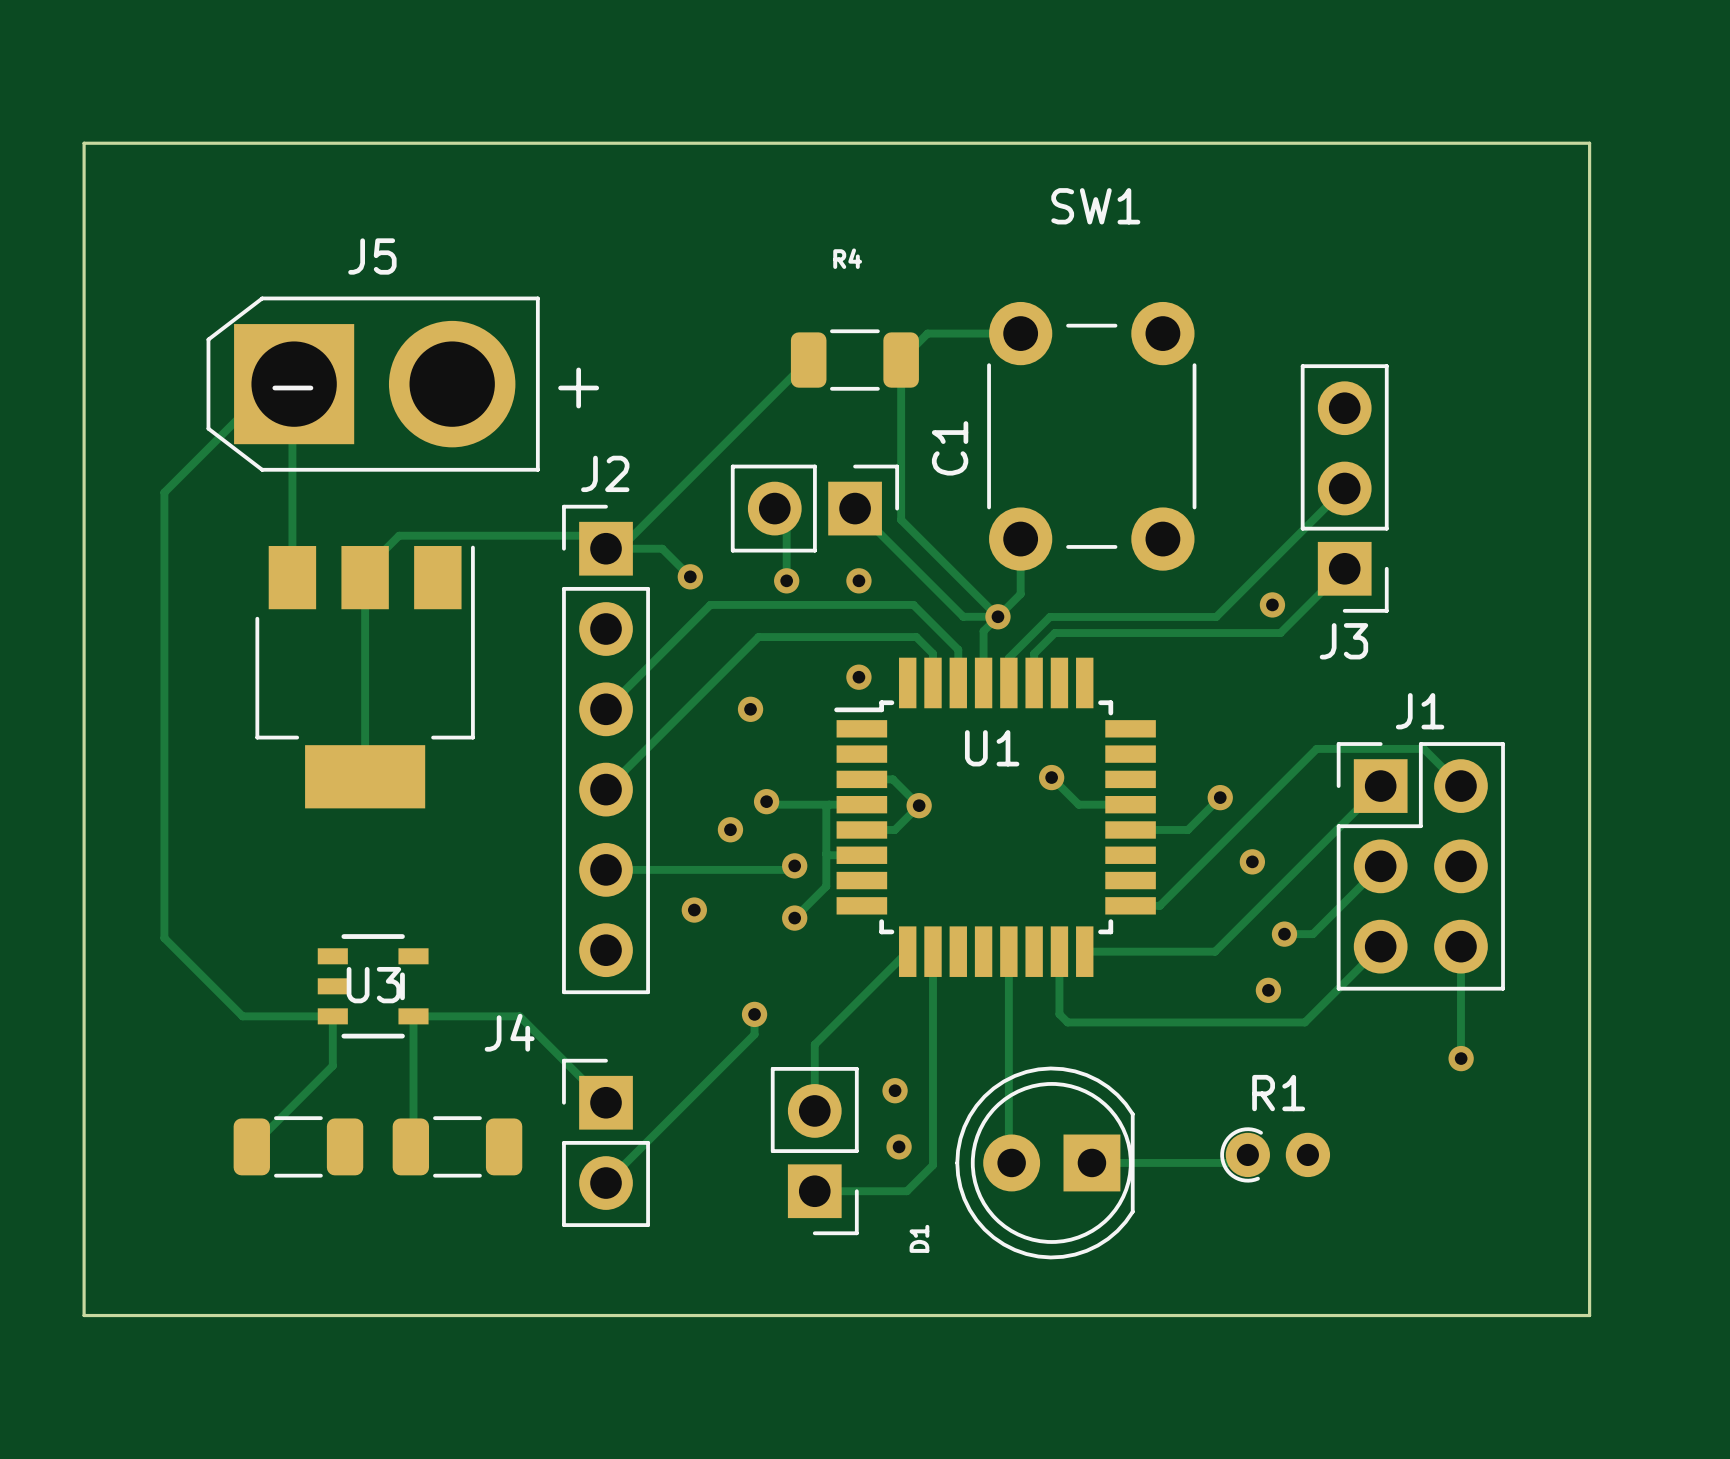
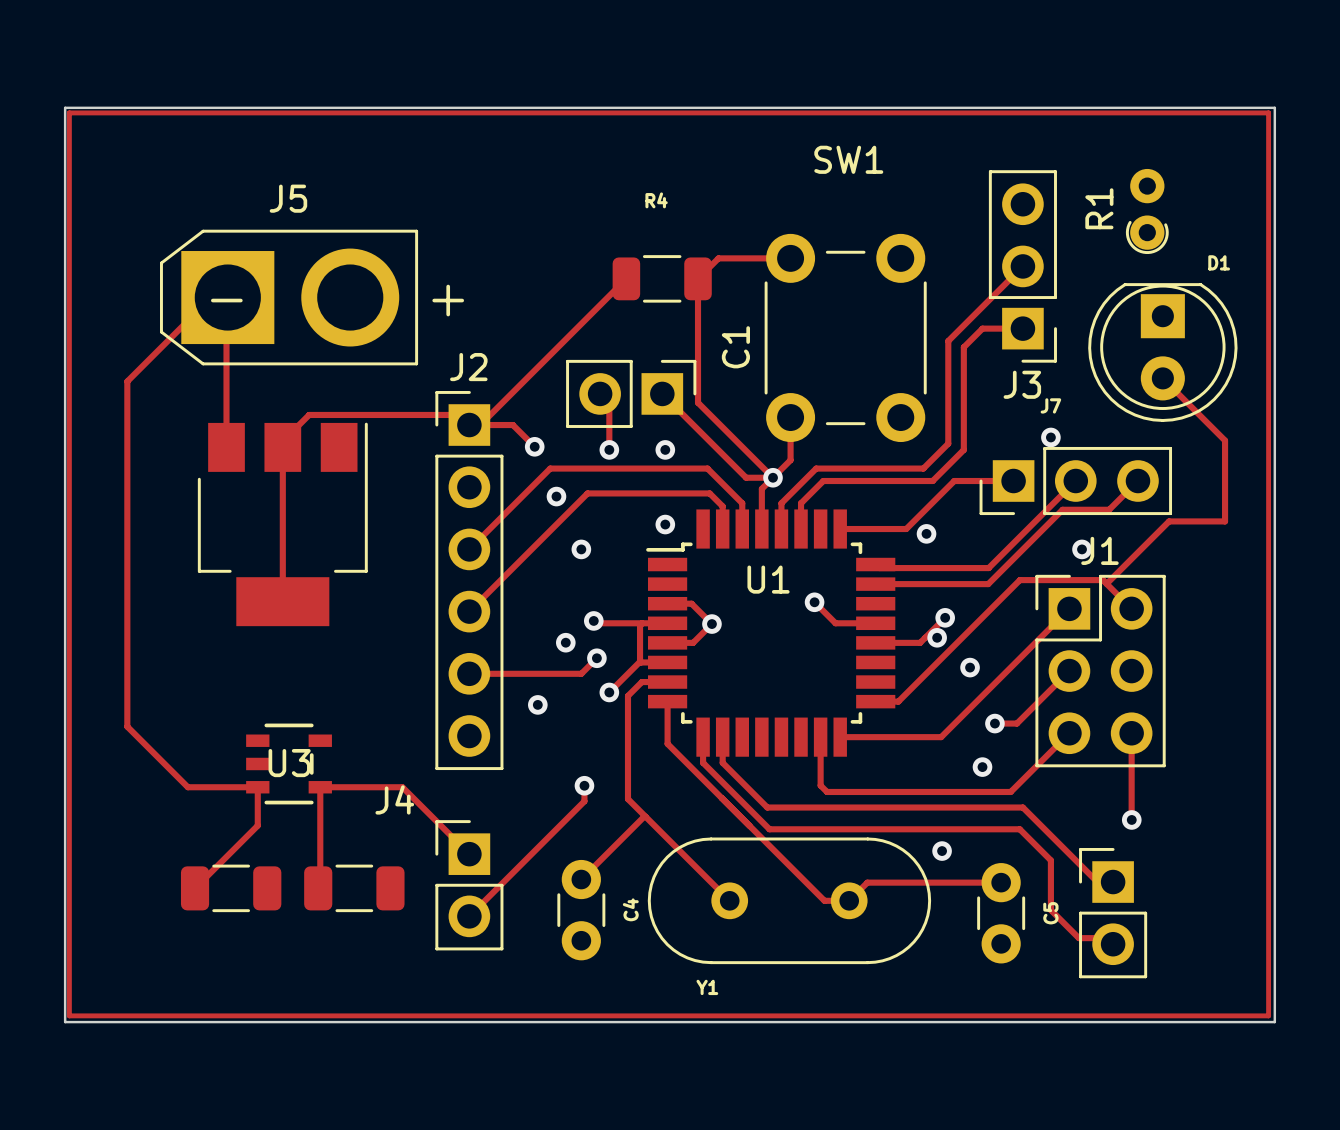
board edge: (84, 143) (1589, 143) (1589, 1315) (84, 1315) -> (65, 110) (65, 107) (1274, 107) (1274, 1022) (65, 1022) (65, 1018)
track: none -> (69, 112) (1268, 112) (1268, 1015) (69, 1015) (69, 112)
track: (1344, 488) (1216, 616) (1049, 616) (1008, 658) -> (1022, 266) (948, 341) (948, 443) (923, 468) (816, 468) (781, 503) (781, 509)
J3 position: (1344, 488) -> (1022, 266)
track: none -> (1162, 378) (1225, 440) (1225, 521) (1169, 521) (1106, 583)
via: none -> (1050, 437)
track: (1344, 568) (1280, 633) (1054, 633) (1034, 653) -> (1022, 328) (982, 328) (963, 347) (963, 449) (932, 481) (823, 481) (801, 503) (801, 506)
via: (1272, 604) -> none
track: none -> (1013, 481) (954, 481) (906, 529) (840, 529)
track: none -> (1075, 481) (988, 568) (879, 568) (875, 564)
J7: none -> (1075, 481)
track: none -> (1137, 481) (1109, 509) (1062, 509) (988, 584) (875, 584)
via: none -> (556, 496)
via: none -> (926, 533)
via: none -> (1082, 549)
via: none -> (937, 637)
track: (826, 854) (826, 886) (794, 918) -> (640, 661) (609, 692)
track: (794, 865) (790, 869) (750, 869) -> (596, 658) (581, 673)
via position: (794, 865) -> (596, 658)
track: none -> (667, 682) (641, 682) (627, 695) (627, 799) (729, 900)
track: none -> (667, 701) (667, 743) (824, 900) (845, 900)
via position: (794, 918) -> (609, 692)
track: (907, 951) (814, 1044) (814, 1110) -> (703, 737) (703, 762) (769, 829) (1019, 829) (1050, 860) (1050, 910) (1078, 938) (1107, 938) (1113, 944)
track: (1008, 951) (1008, 1160) (1011, 1162) -> none
track: (933, 984) (933, 1165) (906, 1191) (814, 1191) -> (722, 762) (767, 807) (1022, 807) (1097, 882) (1113, 882)
track: none -> (645, 816) (581, 879)
D1 footprint: [955, 1066, 1135, 1260] -> [1088, 283, 1238, 422]
via: (895, 1090) -> none
via: none -> (942, 851)
via: (899, 1146) -> none
part rotation: 0° (814, 1151) -> 180° (1113, 913)
part position: (814, 1151) -> (1113, 913)
track: (1247, 1154) (1239, 1162) (1096, 1162) -> (1001, 882) (867, 882) (849, 900)
R1 rotation: 0° (1275, 1154) -> 90° counterclockwise (1147, 211)
R1 position: (1275, 1154) -> (1147, 211)
Y1: none -> (789, 900)
C4: none -> (581, 910)
C5: none -> (1001, 913)
D1 name position: D1 (919, 1238) -> D1 (1219, 262)

